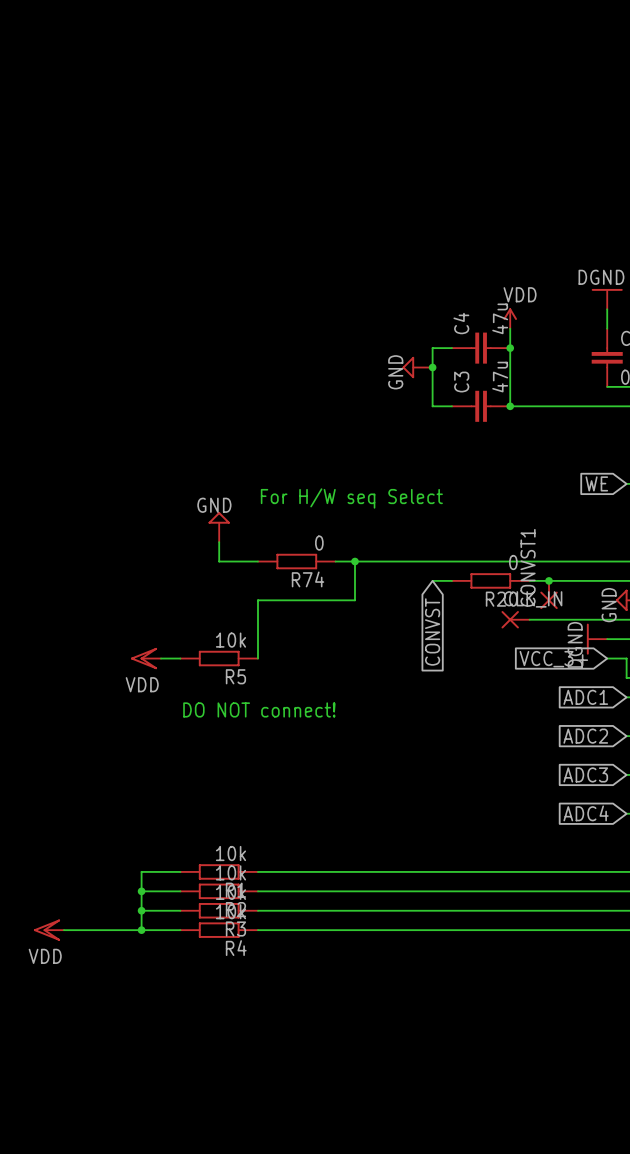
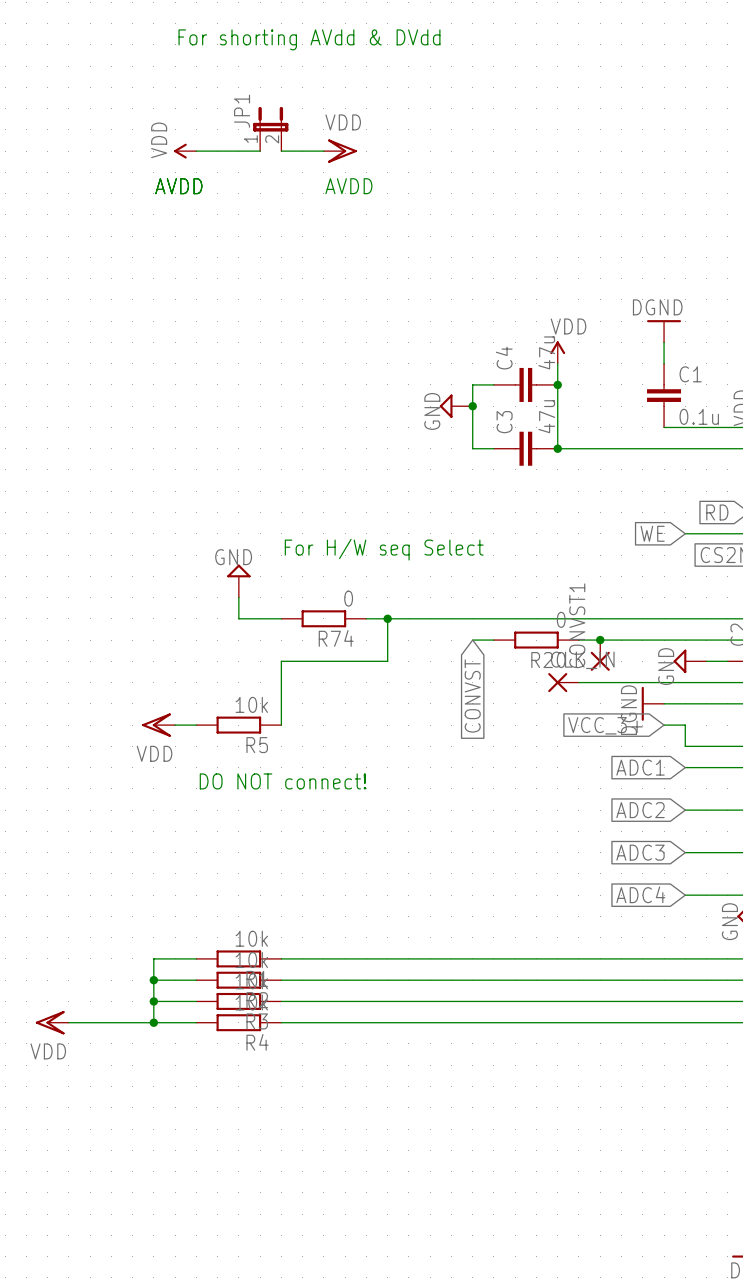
text: none -> For shorting AVdd & DVdd (309, 39)
JP1: none -> (270, 129)
power symbol: none -> VDD (185, 151)
wire: none -> (196, 151) (260, 151)
wire: none -> (281, 151) (323, 151)
power symbol: none -> VDD (340, 151)
text: none -> AVDD (178, 186)
text: none -> AVDD (348, 186)

